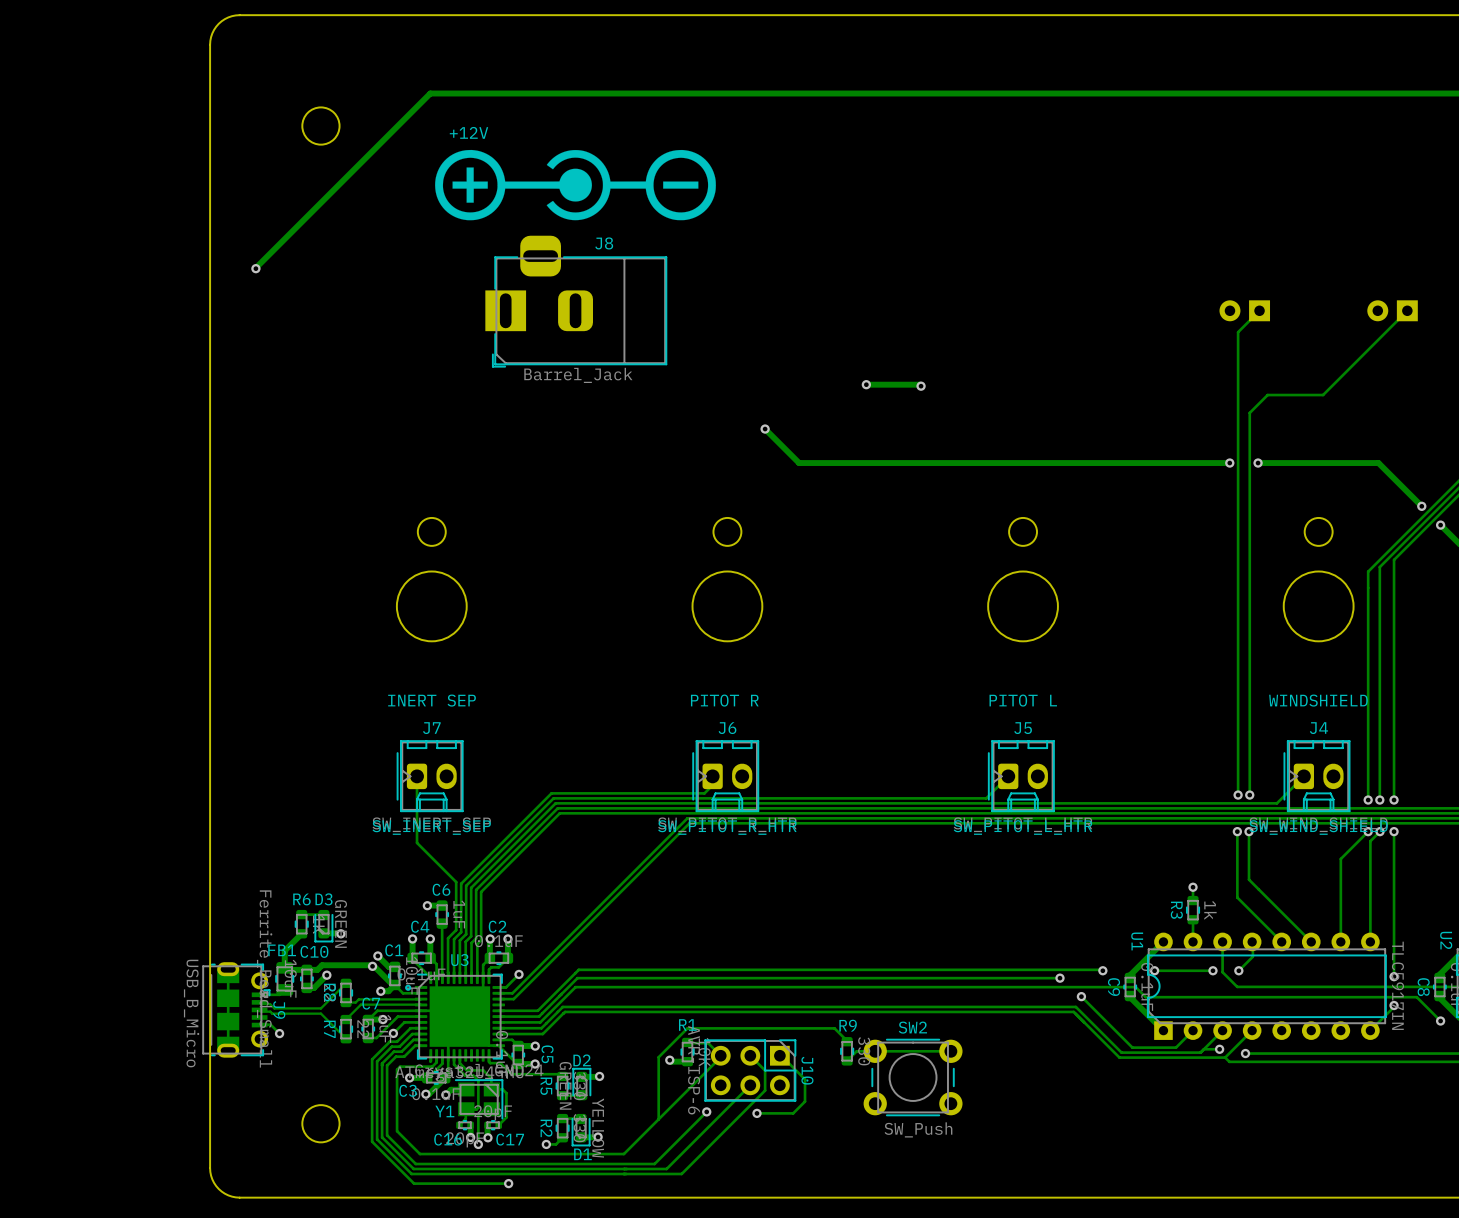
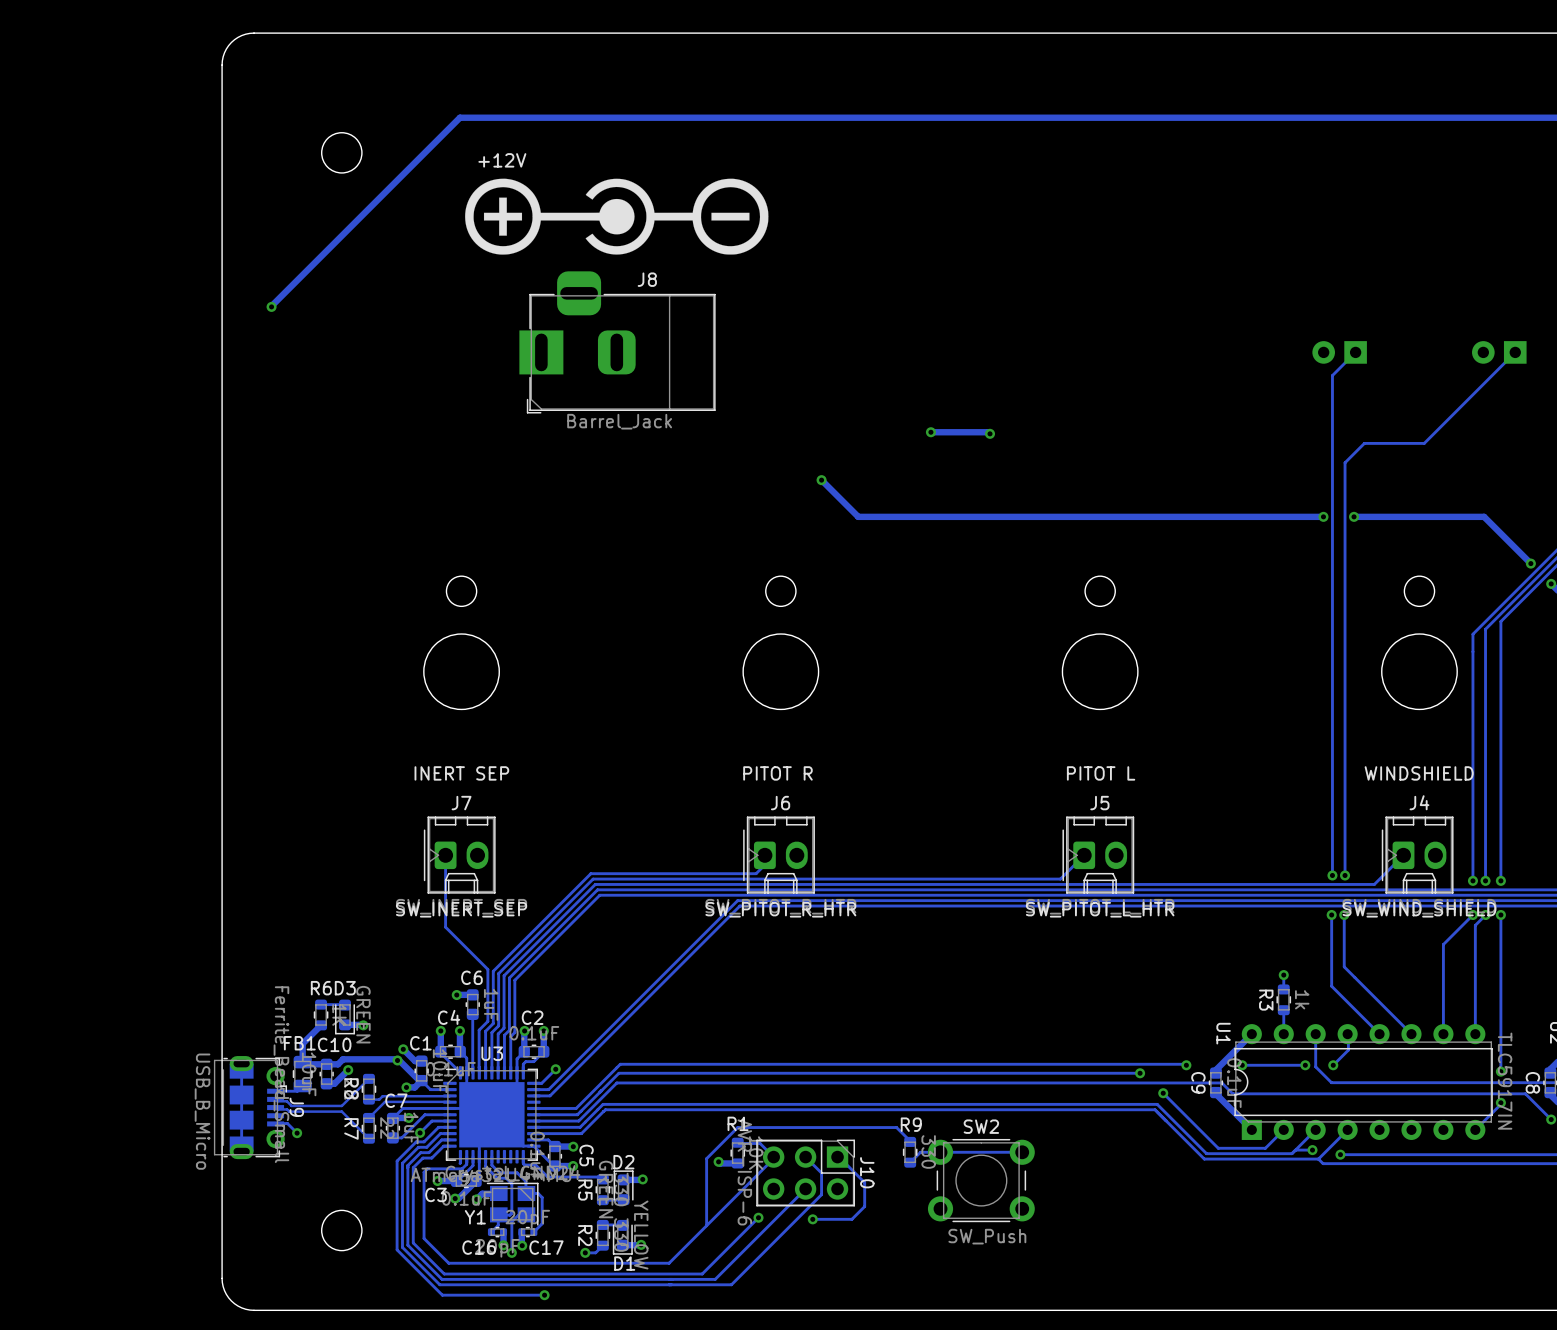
drawing: [405, 984, 411, 991] -> none

